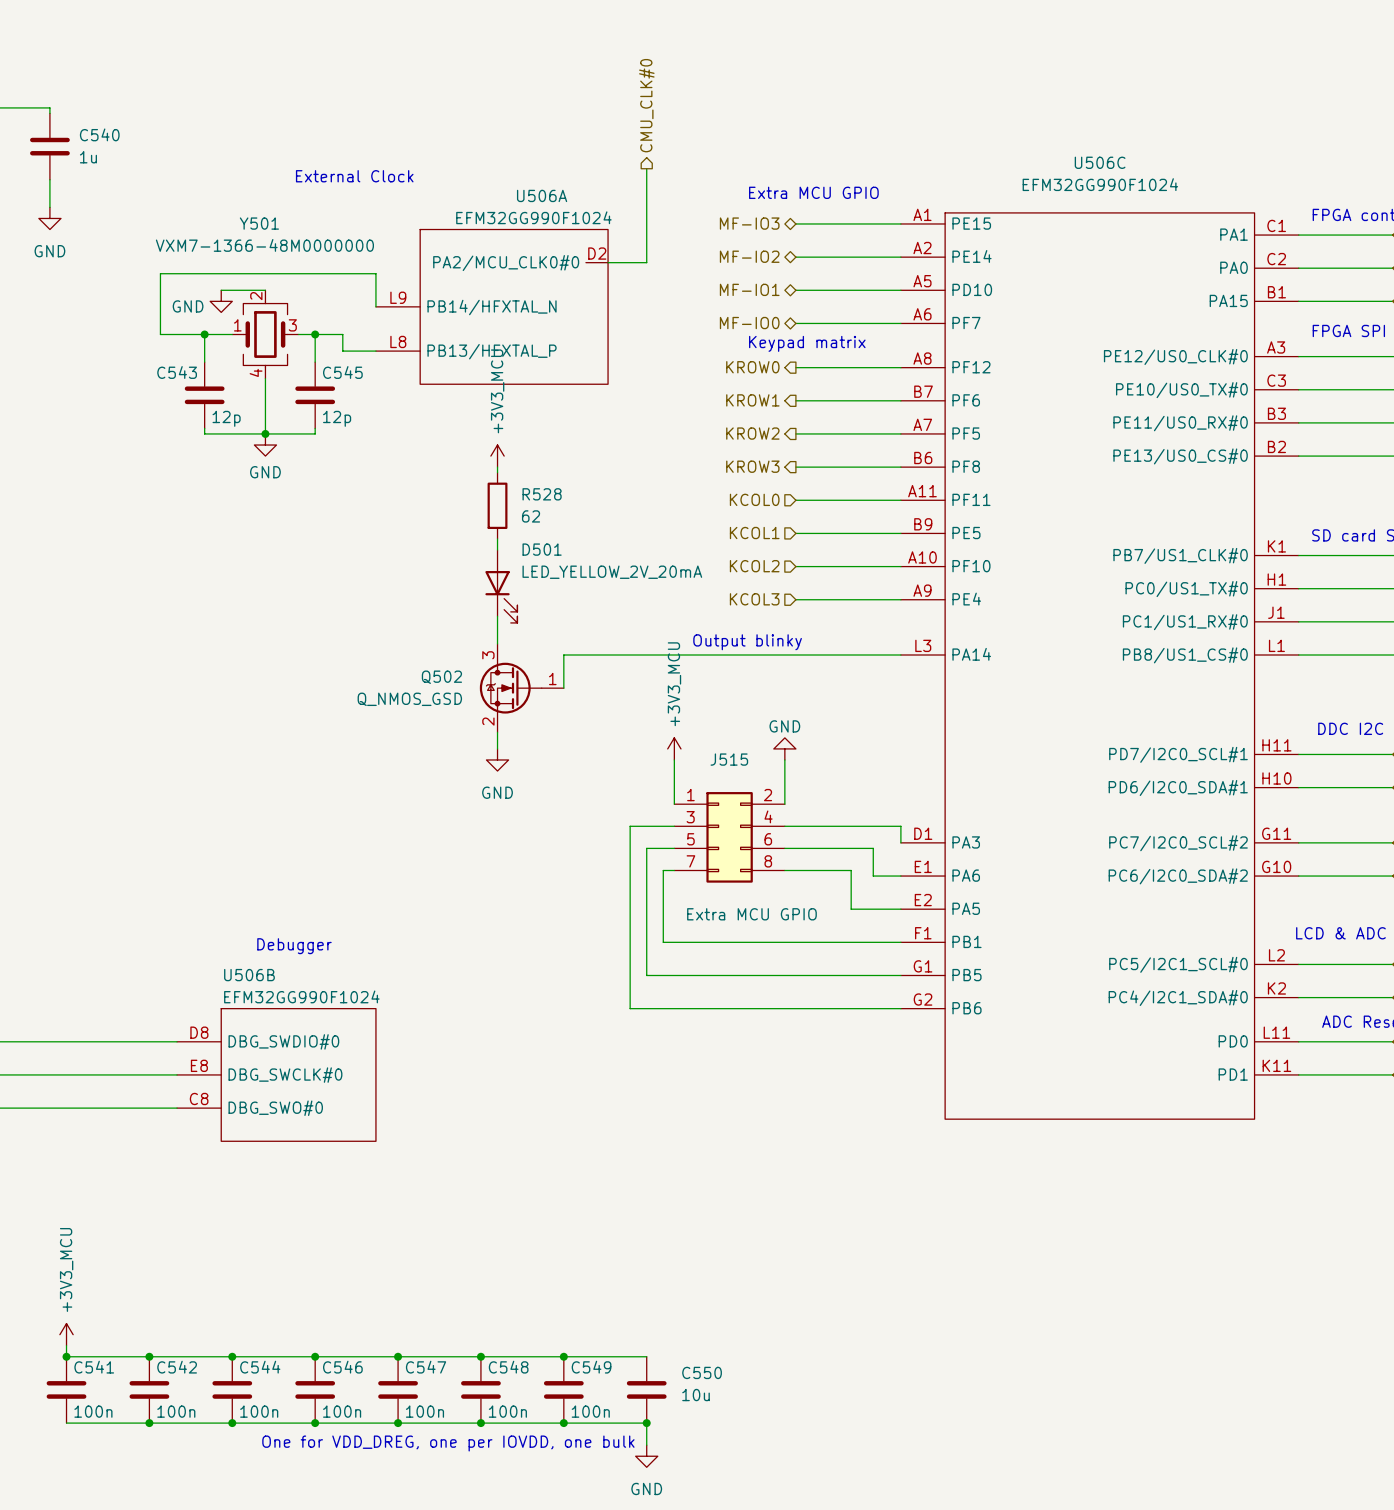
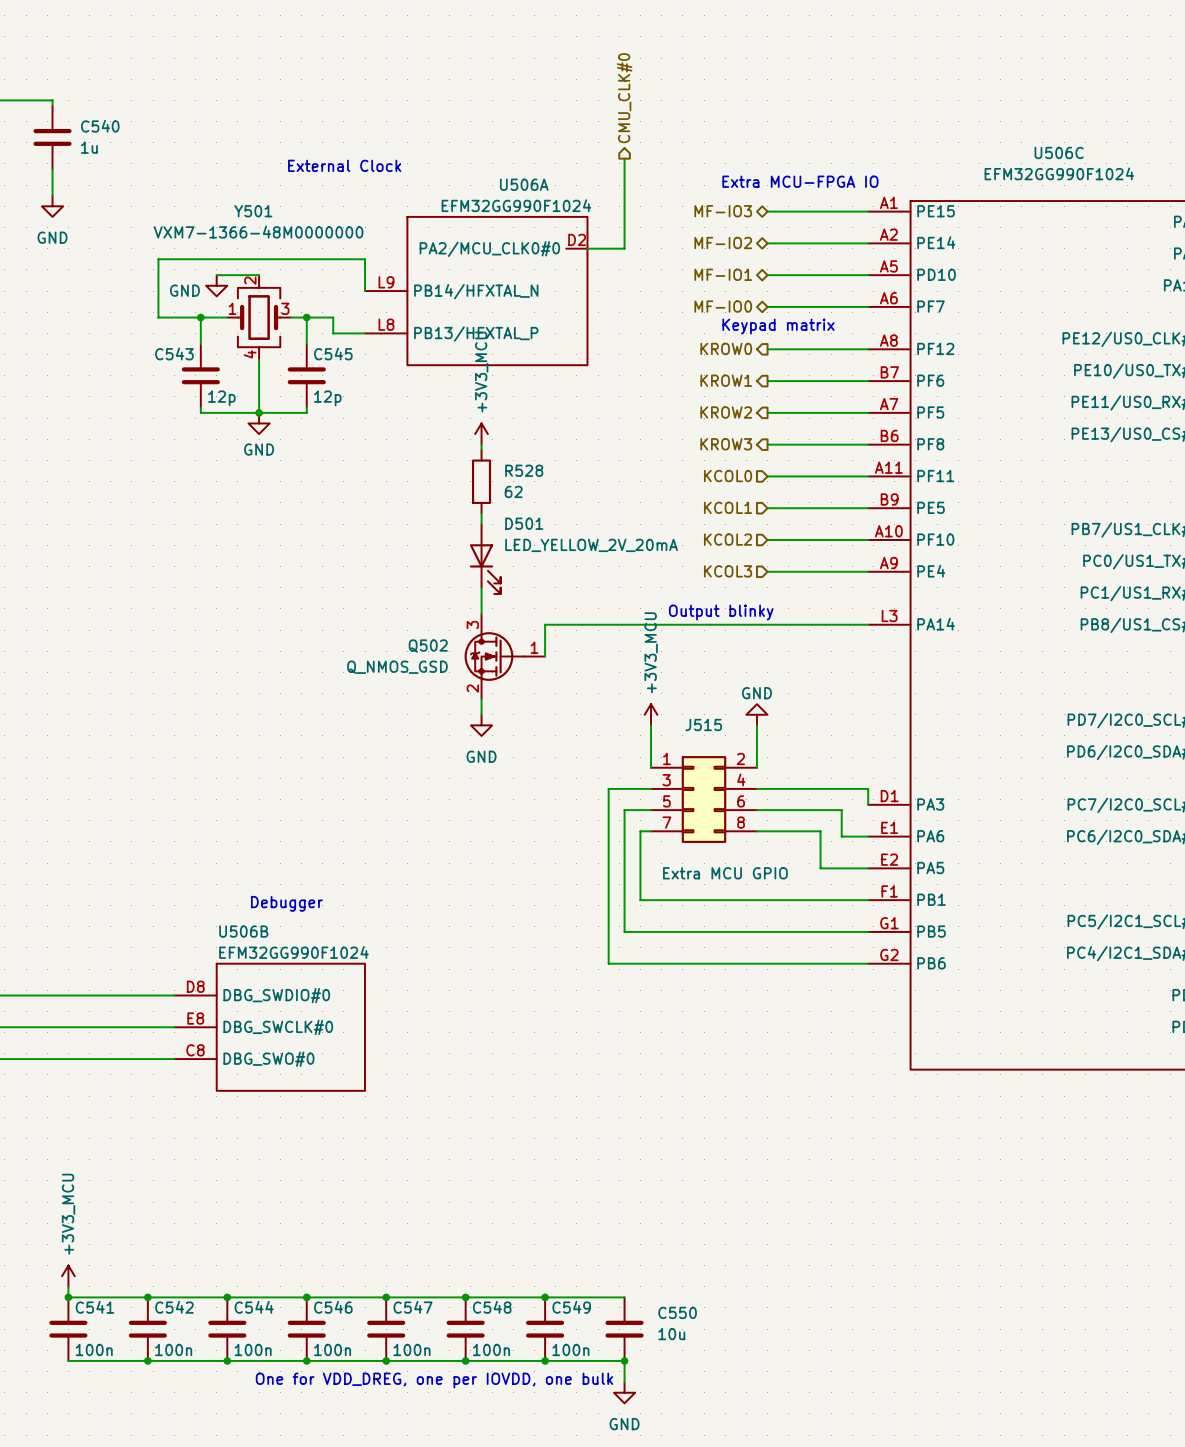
text: Extra MCU GPIO (813, 192) -> Extra MCU-FPGA IO (800, 181)

